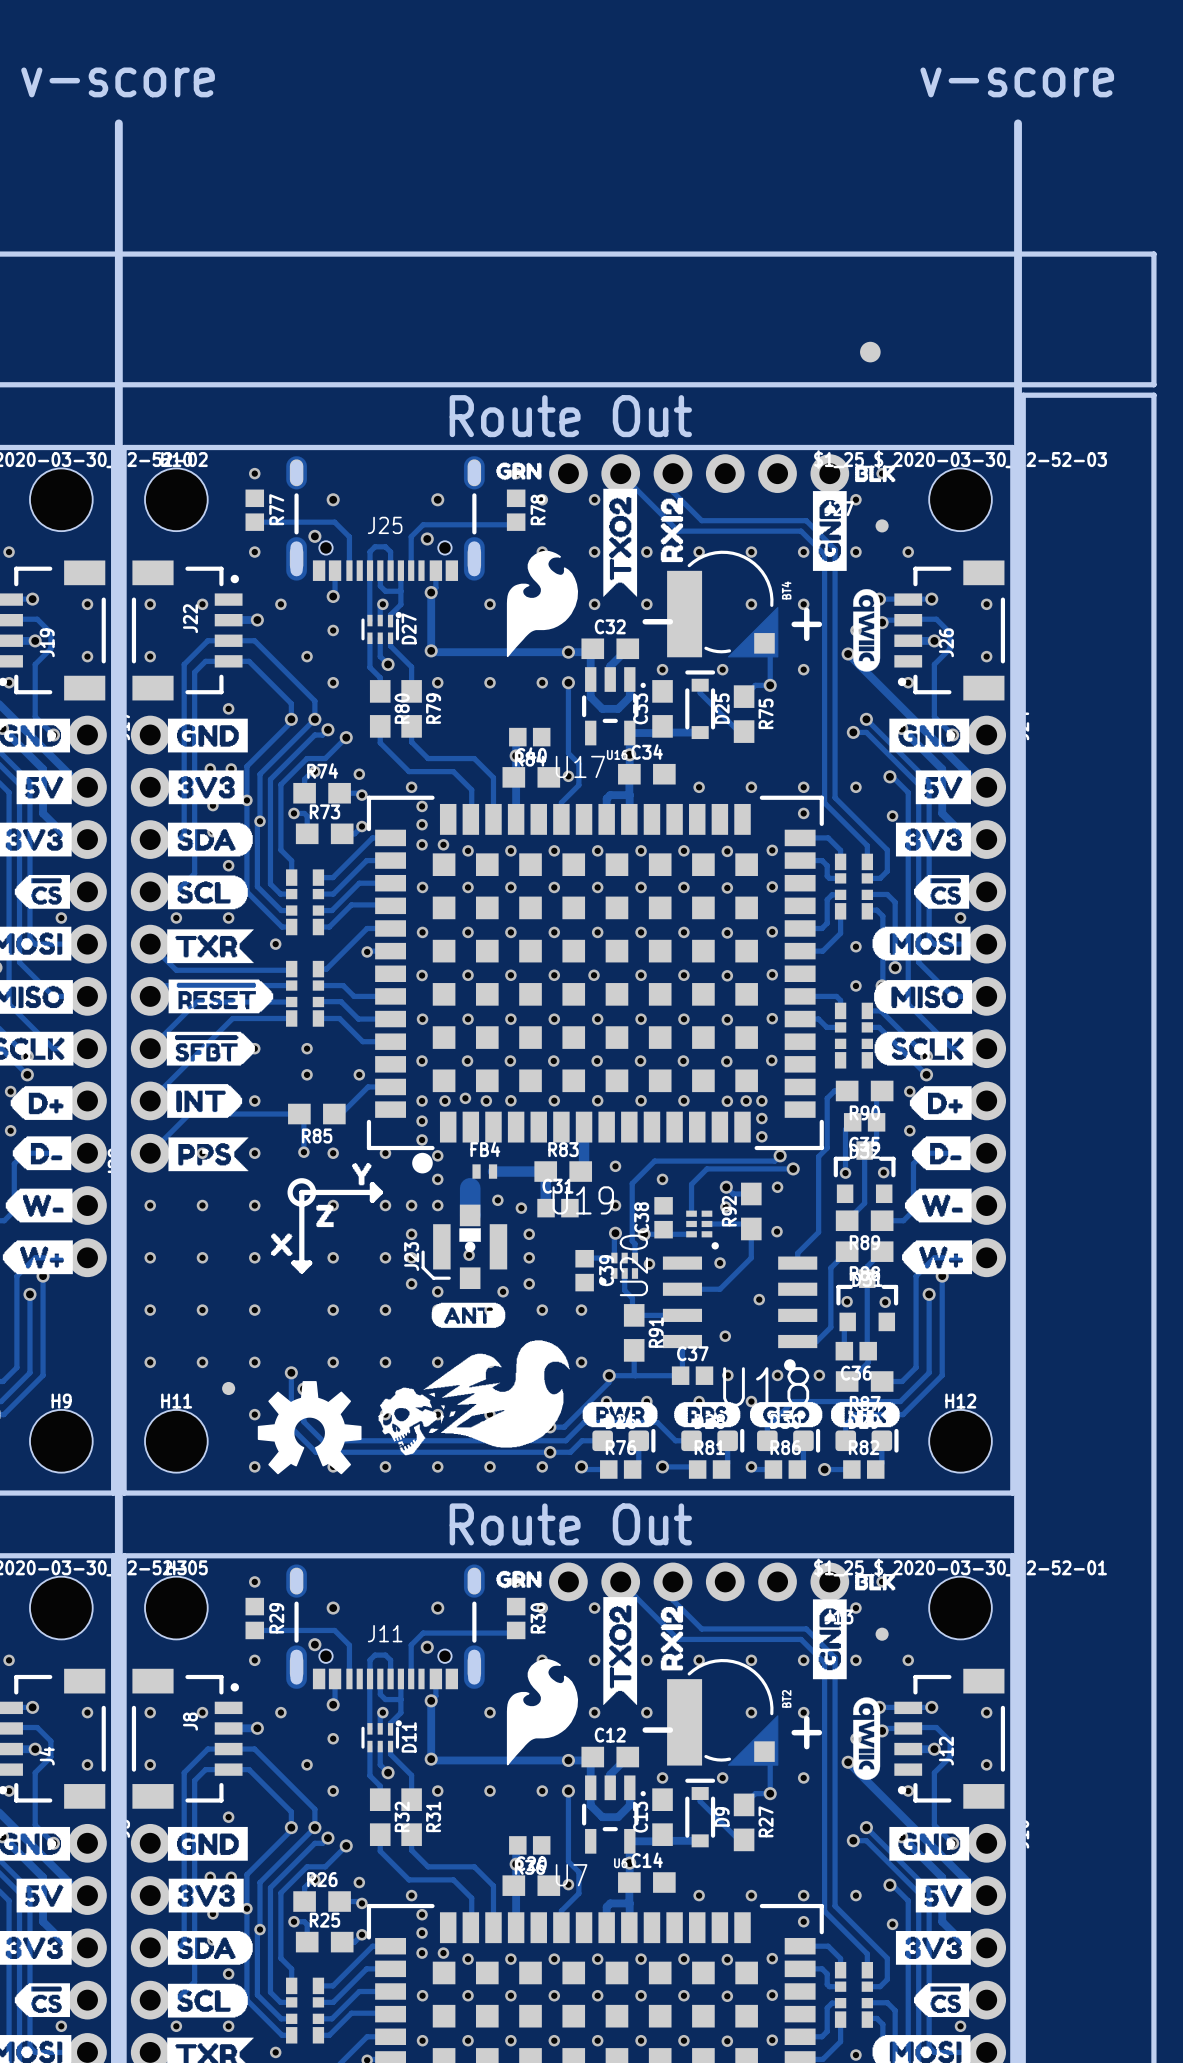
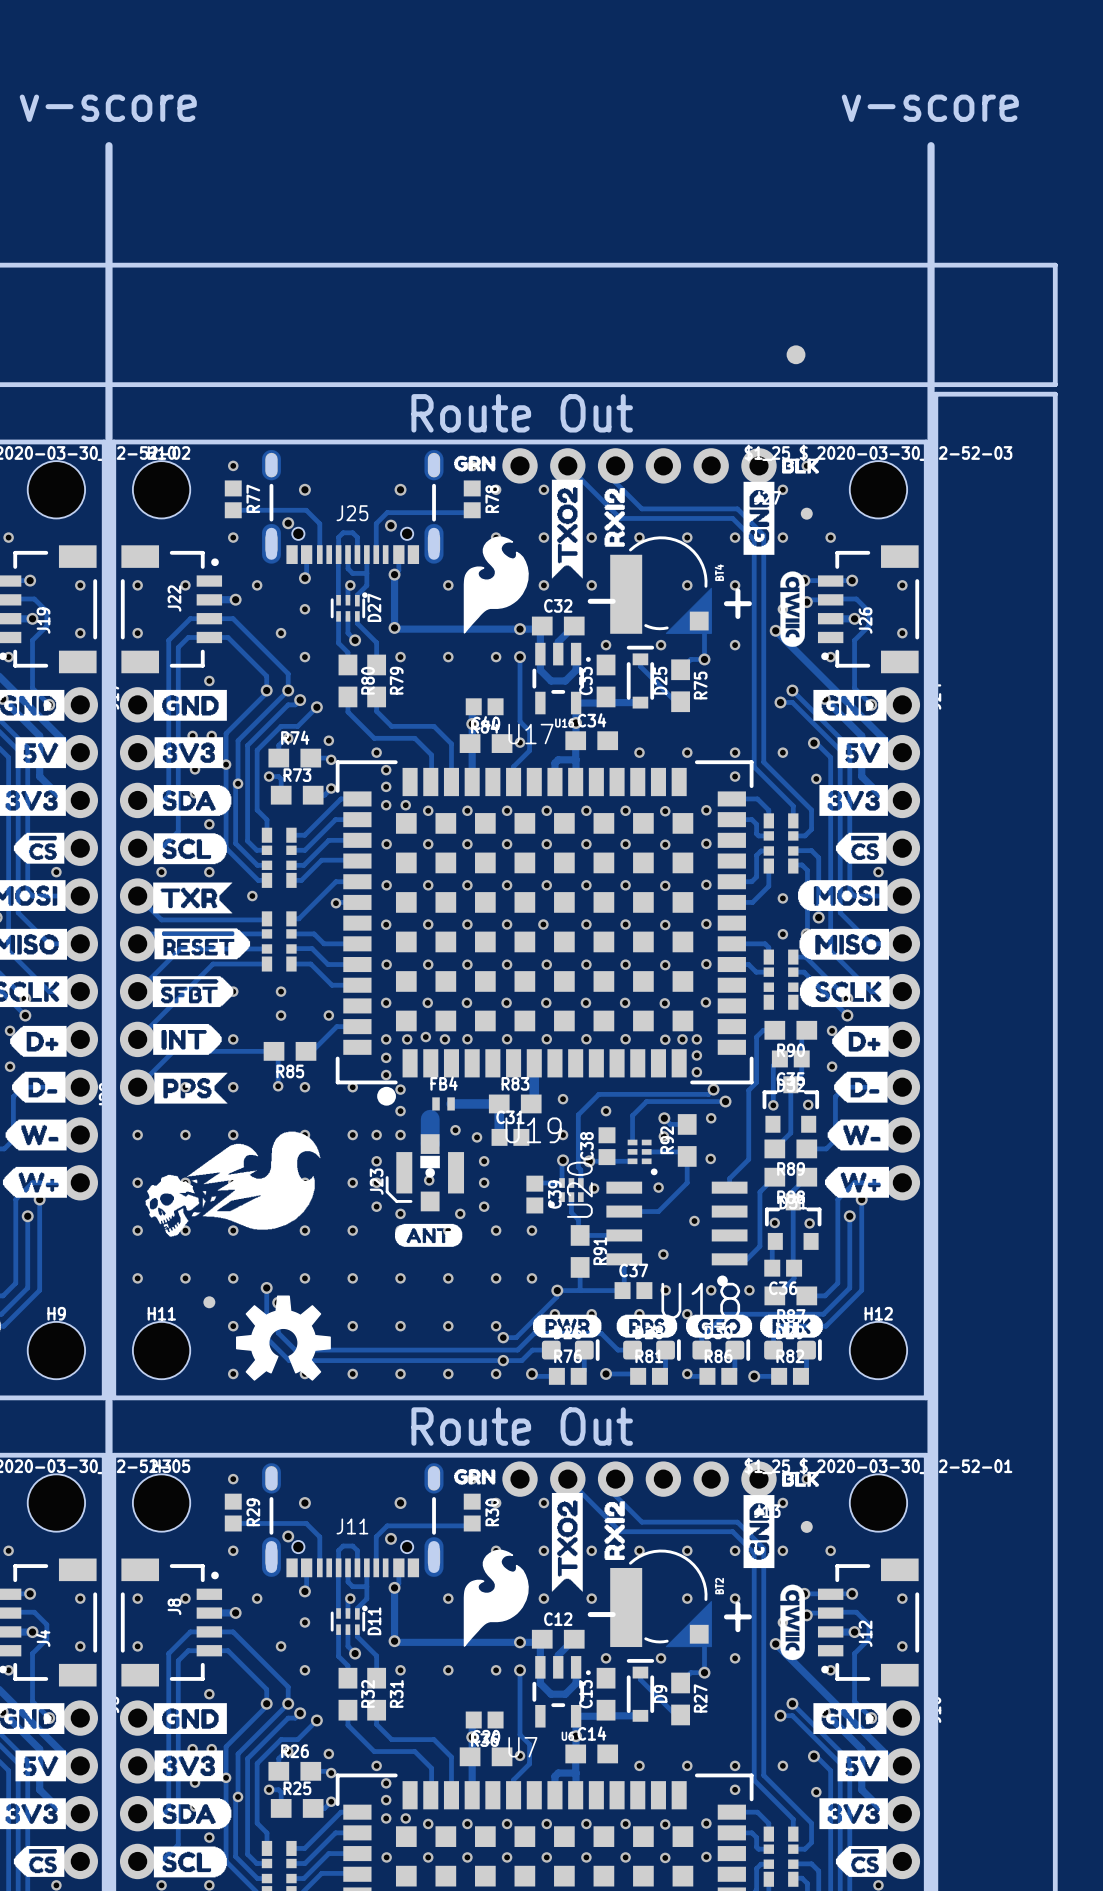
drawing: [352, 1163, 372, 1186] -> none
drawing: [287, 1178, 334, 1228] -> none
line: (380, 1192) (301, 1192) (301, 1270) -> none
line: (380, 1192) (372, 1200) (372, 1184) (380, 1192) -> none
drawing: [271, 1233, 293, 1256] -> none
line: (301, 1270) (293, 1263) (309, 1263) (301, 1270) -> none
drawing position: (473, 1397) -> (232, 1184)

